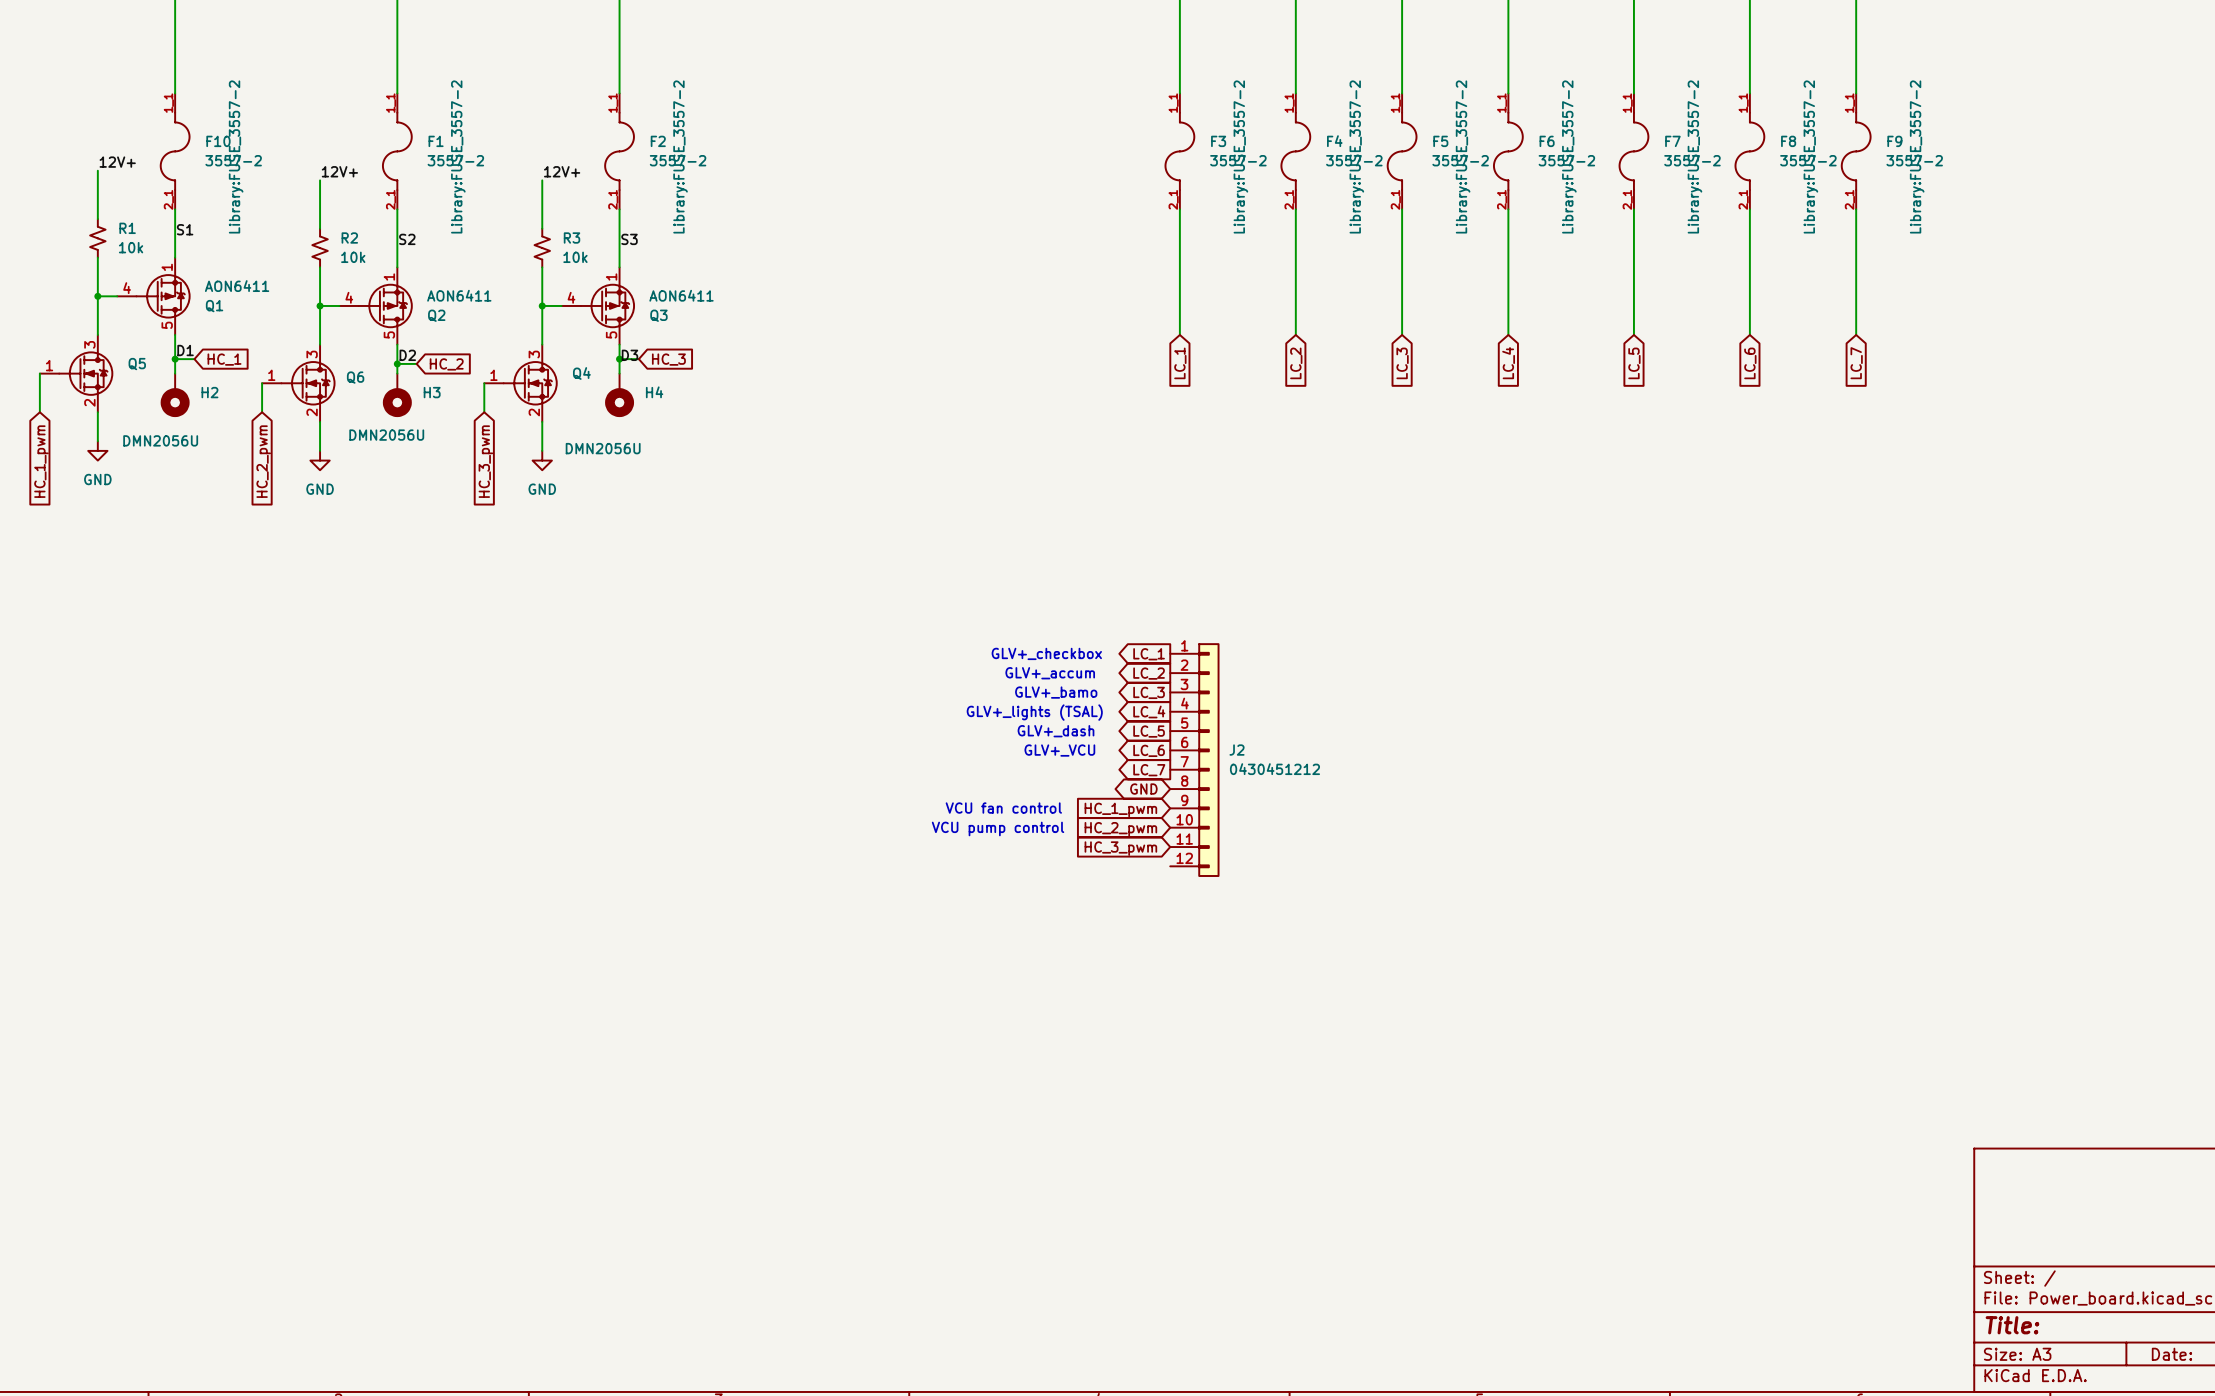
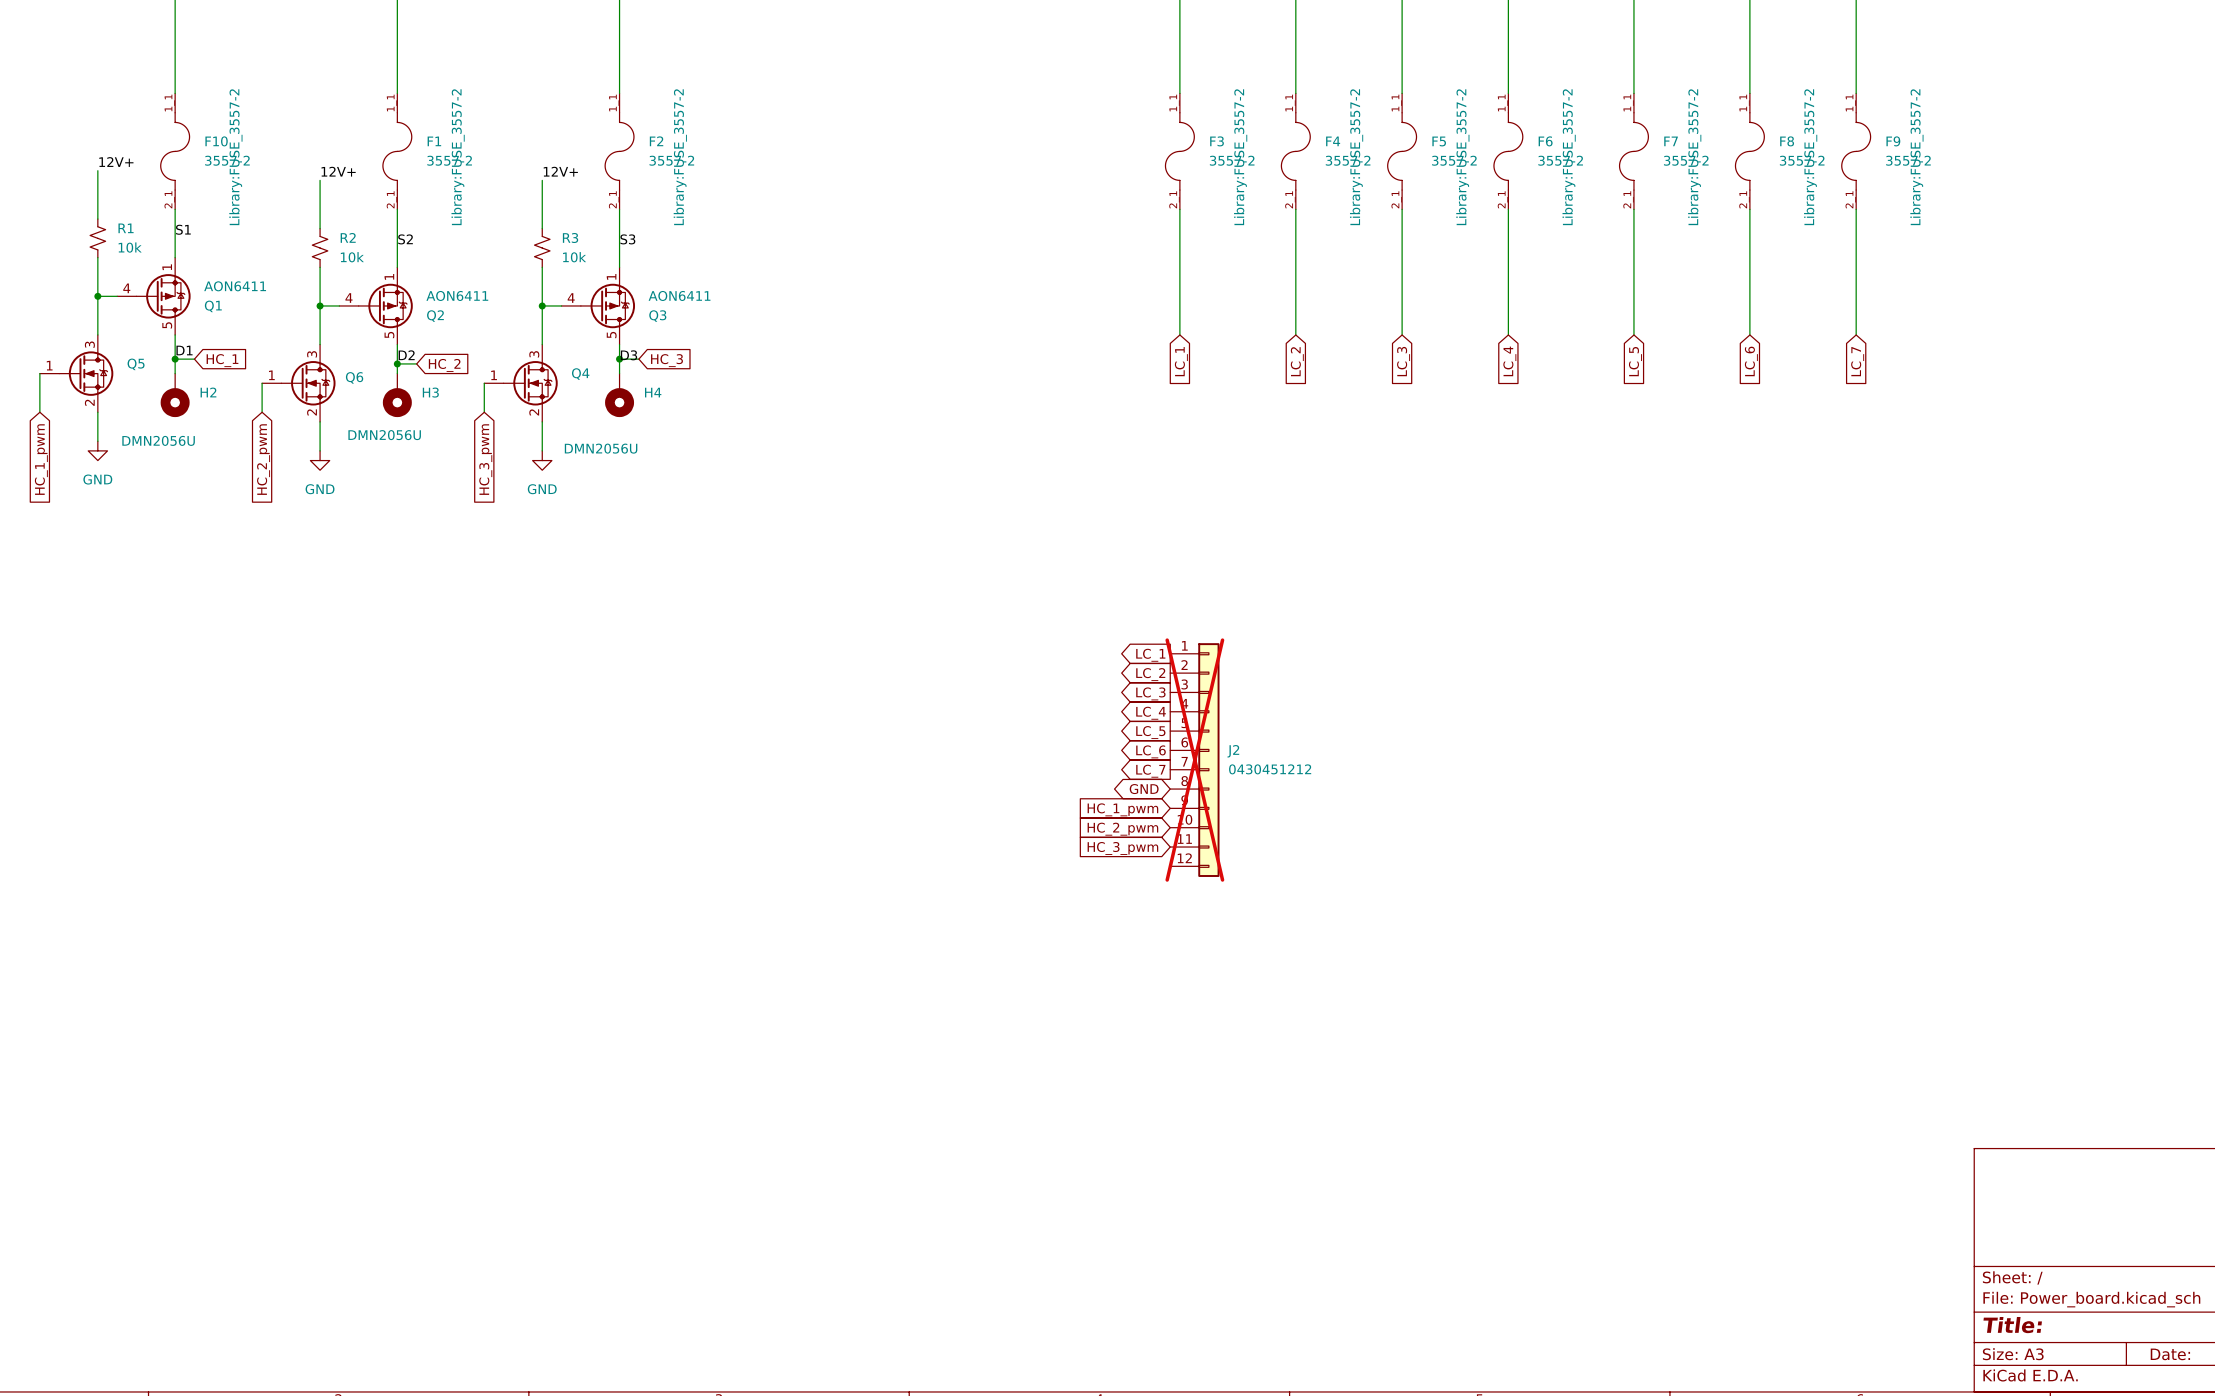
text: GLV+_checkbox (1046, 653) -> none
text: GLV+_accum (1050, 673) -> none
text: GLV+_bamo (1056, 692) -> none
text: GLV+_lights (TSAL) (1034, 712) -> none
text: GLV+_dash (1056, 731) -> none
text: GLV+_VCU (1059, 750) -> none
J2 do-not-place cross: none -> (1194, 760)
text: VCU fan control (1003, 808) -> none
text: VCU pump control (998, 828) -> none

